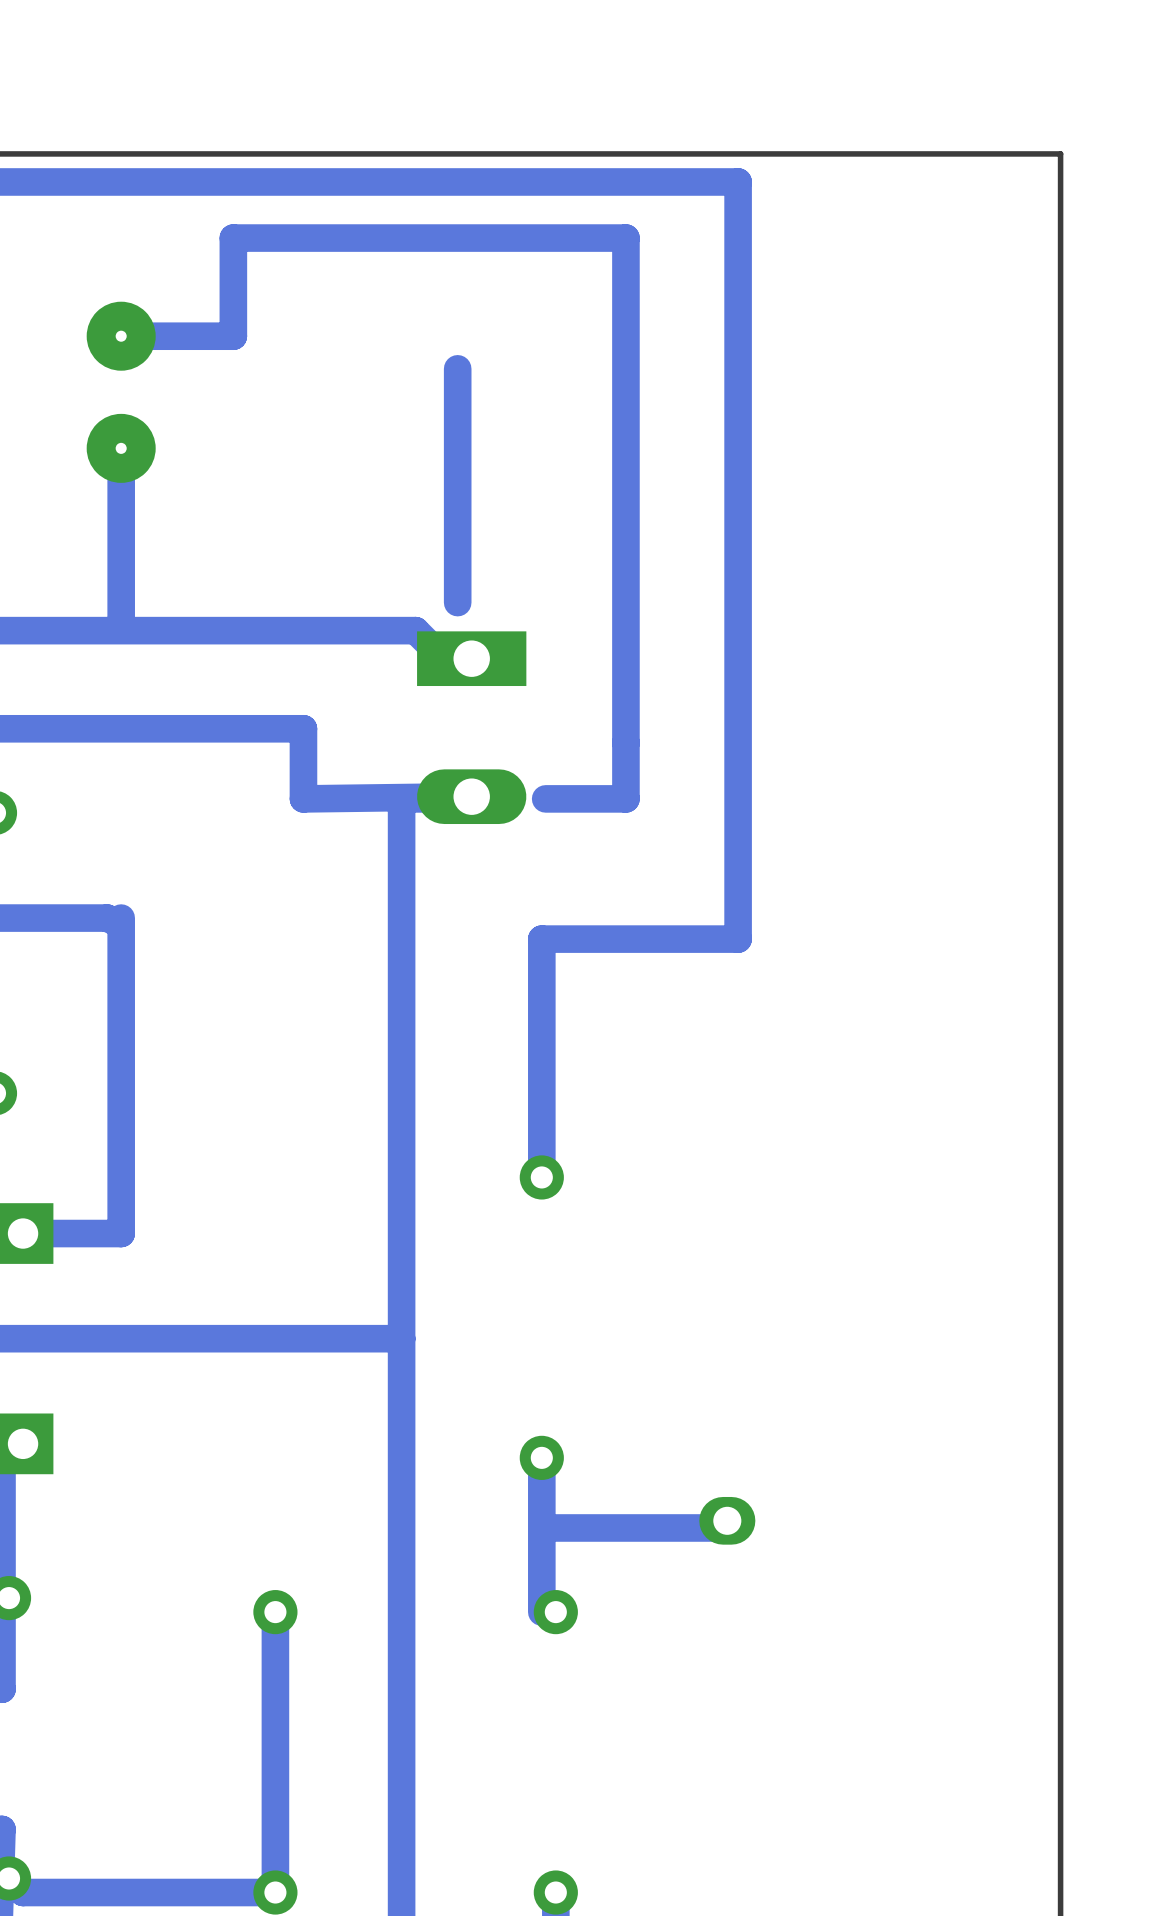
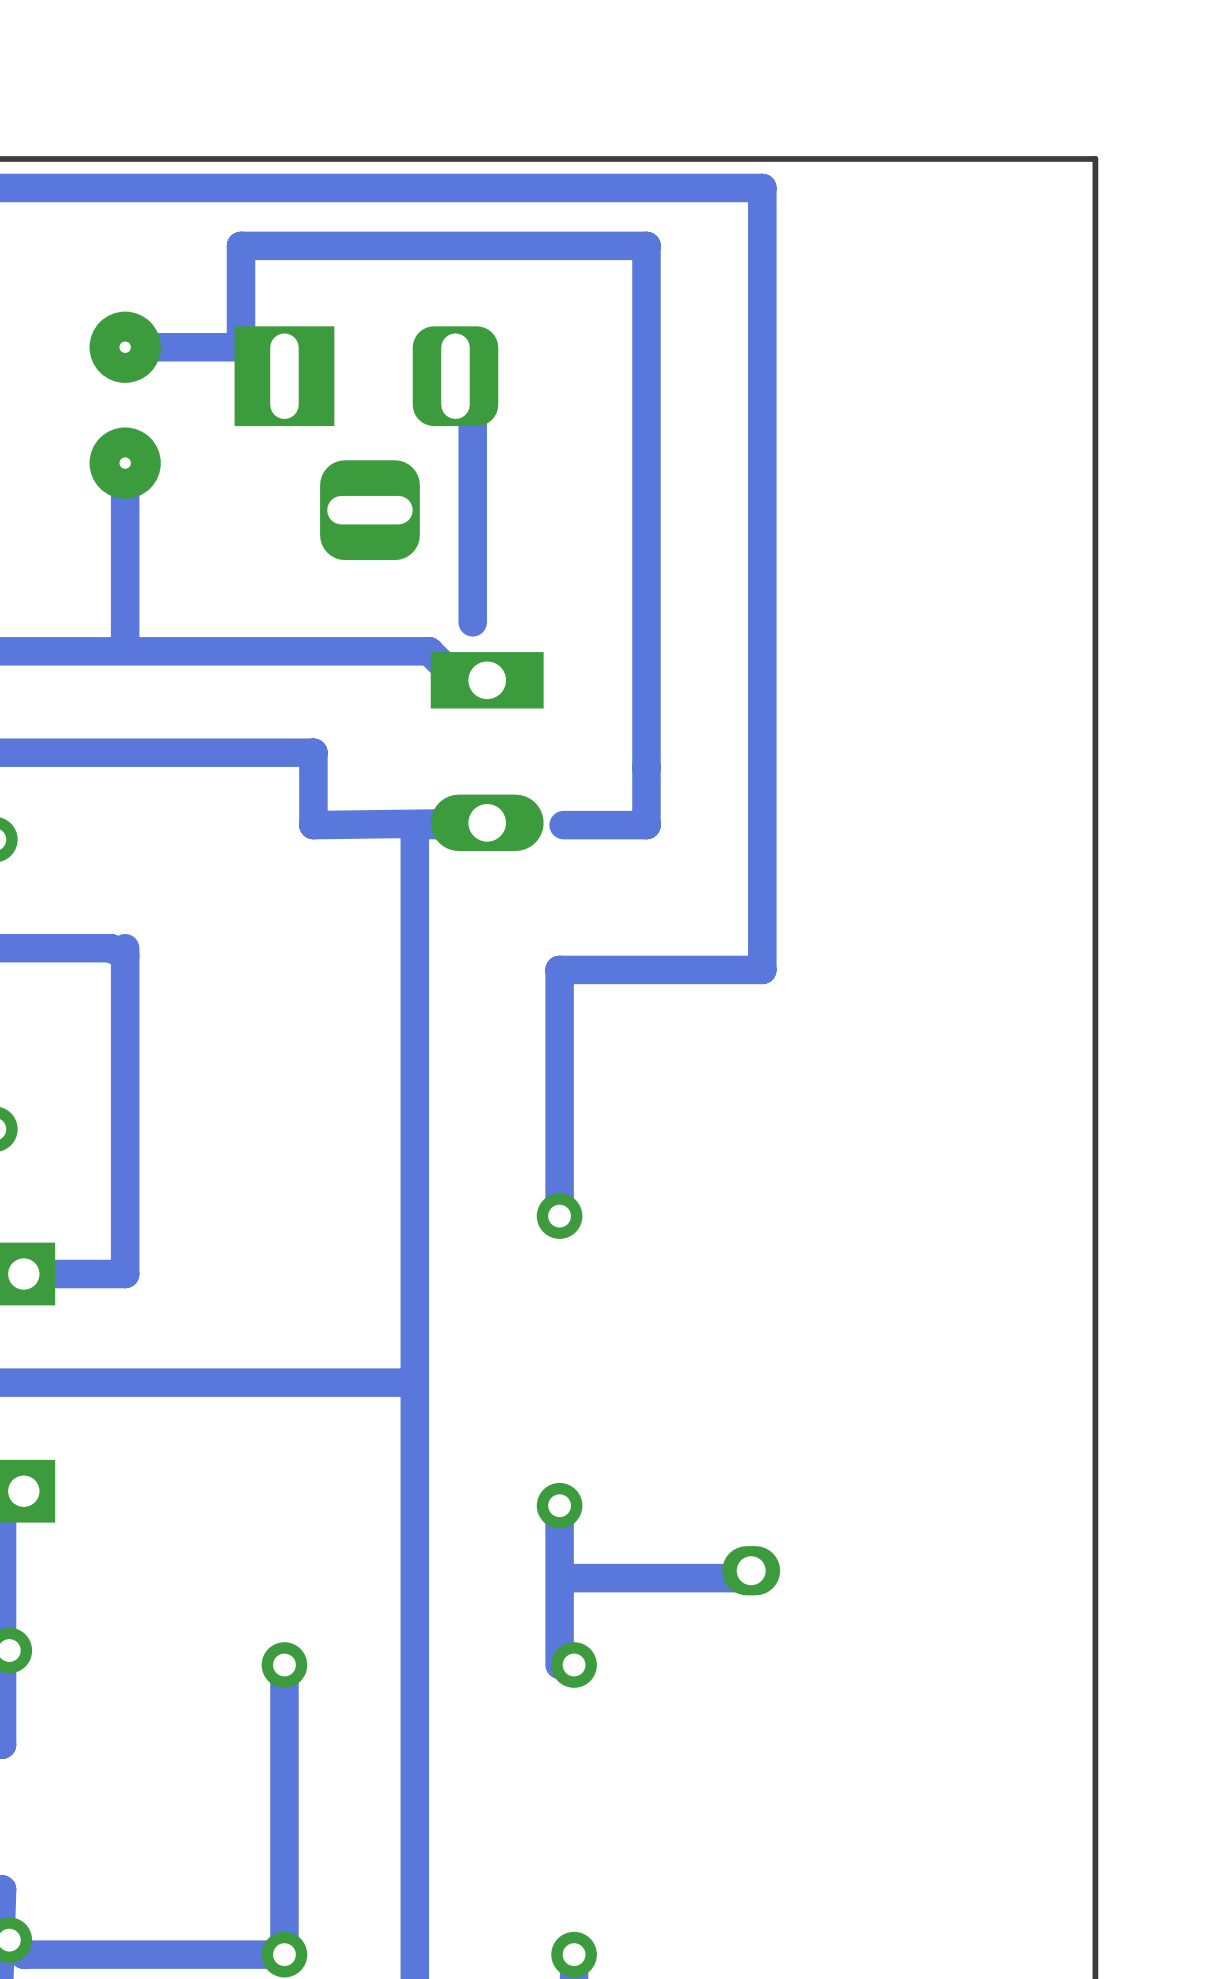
part: none -> (366, 443)

